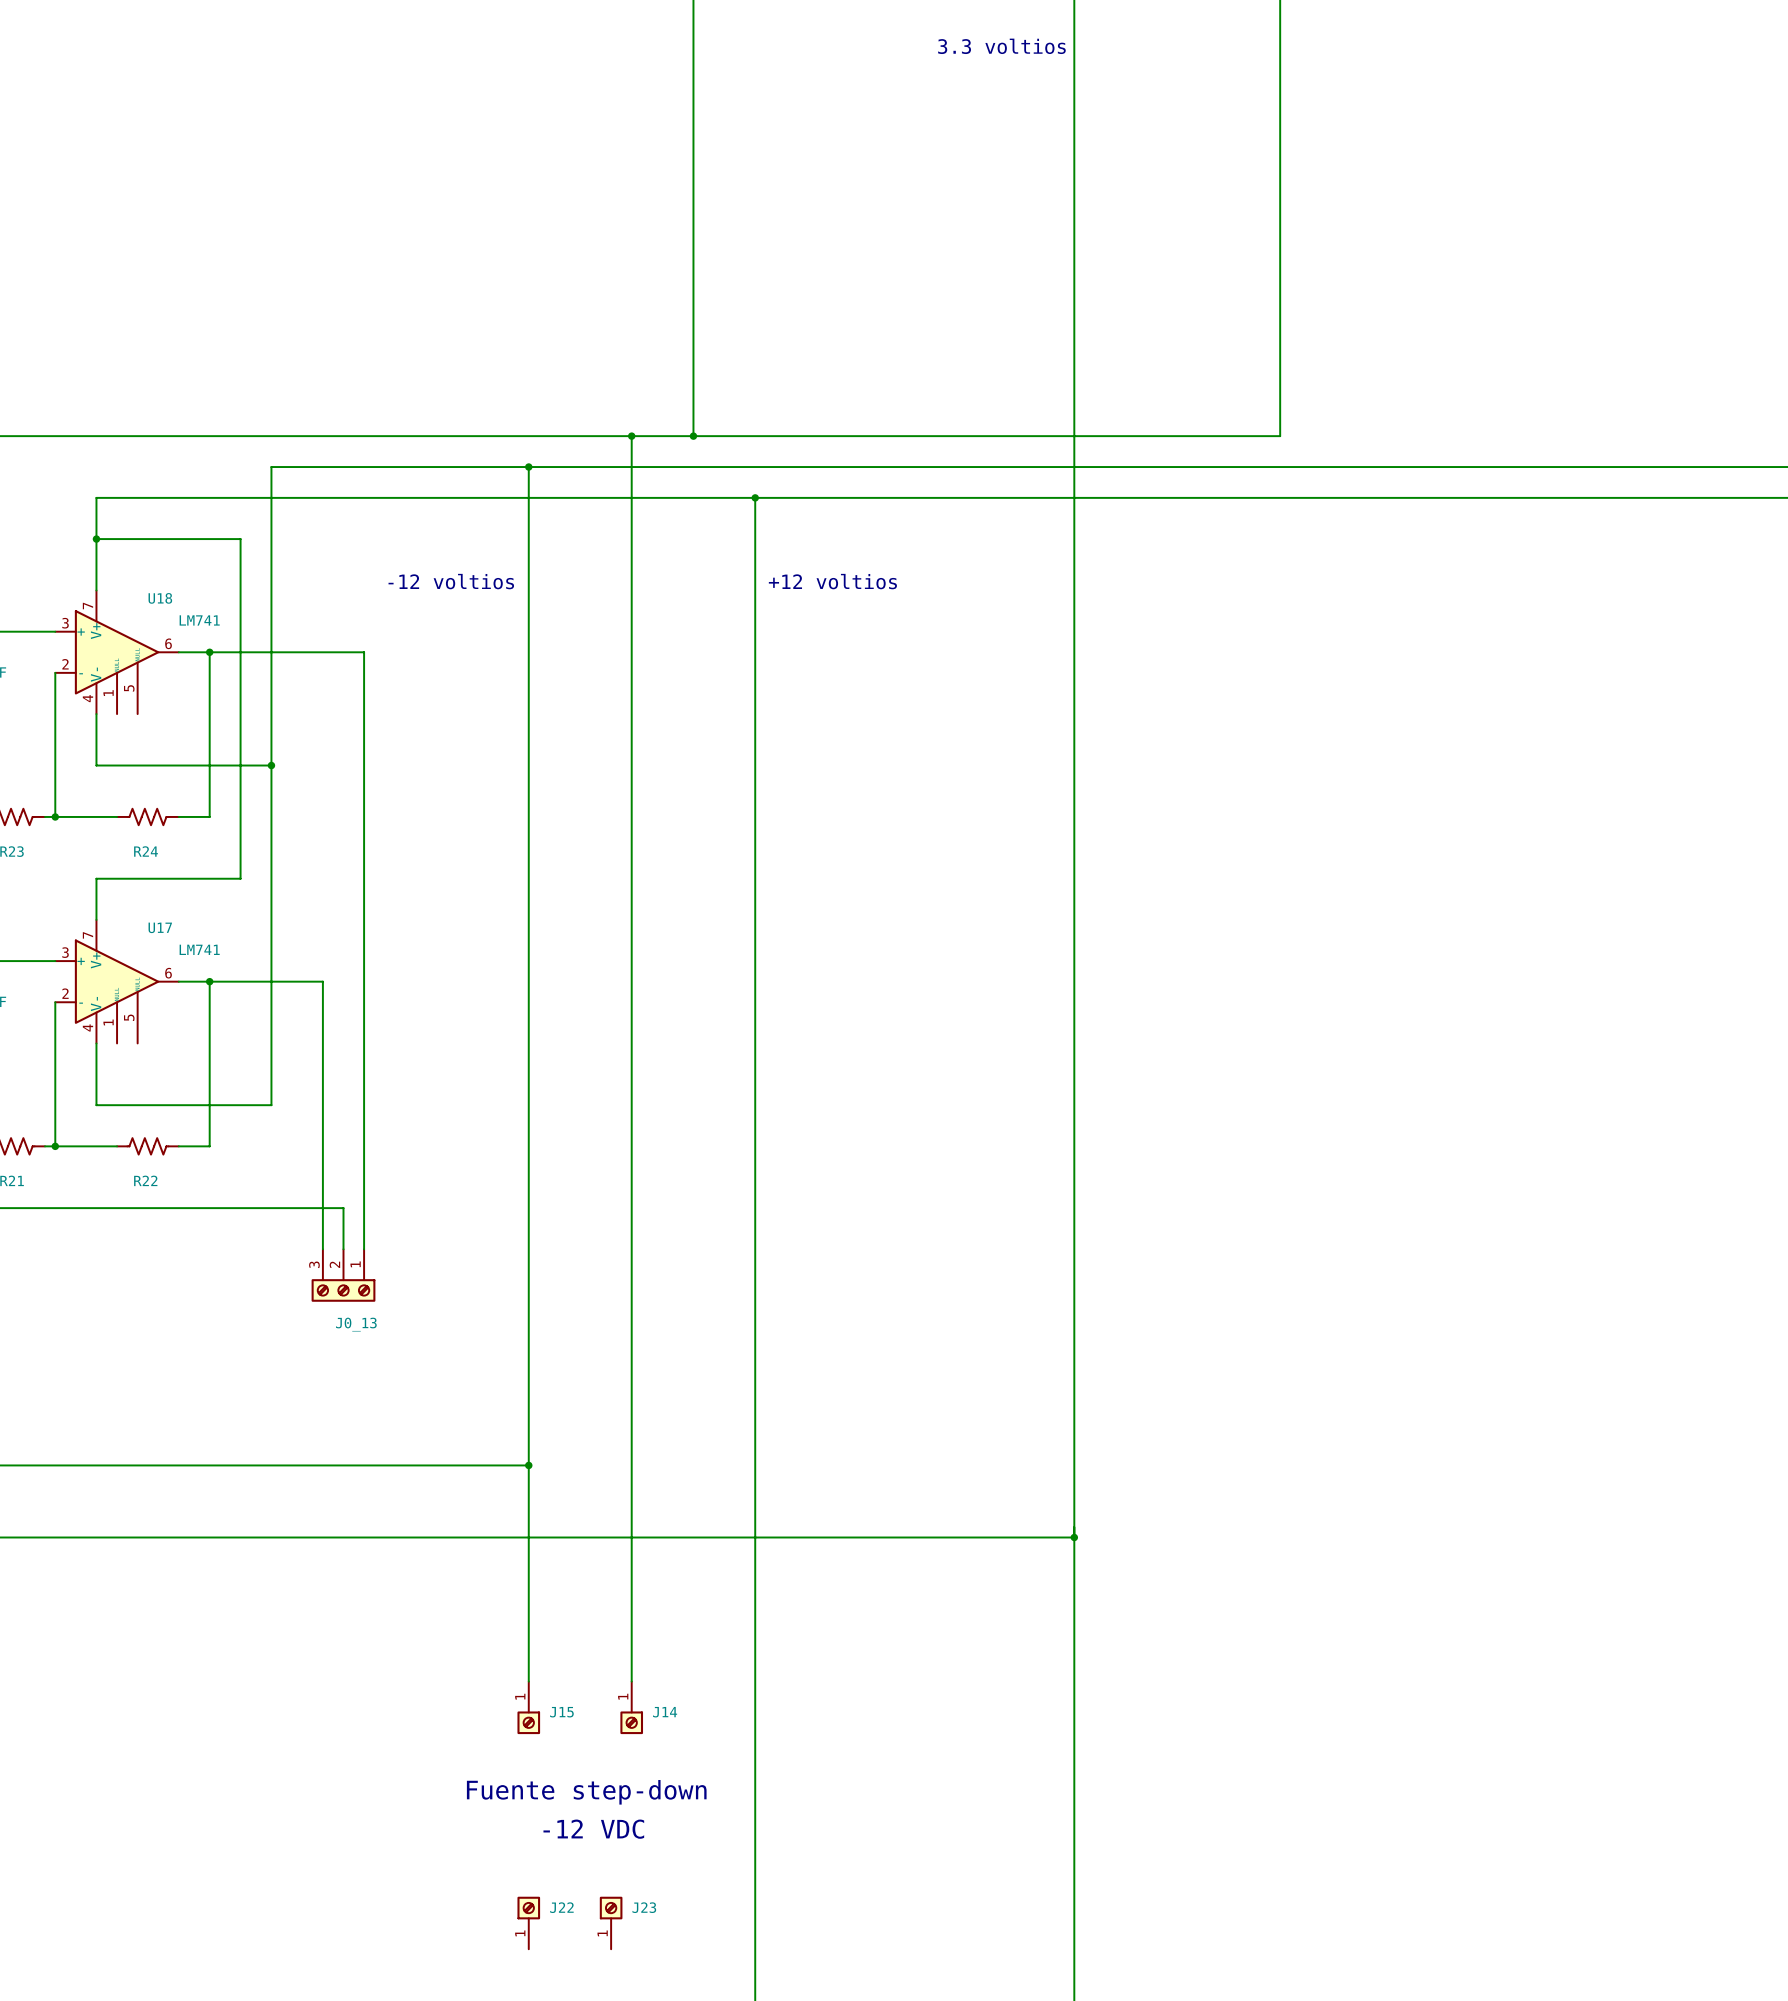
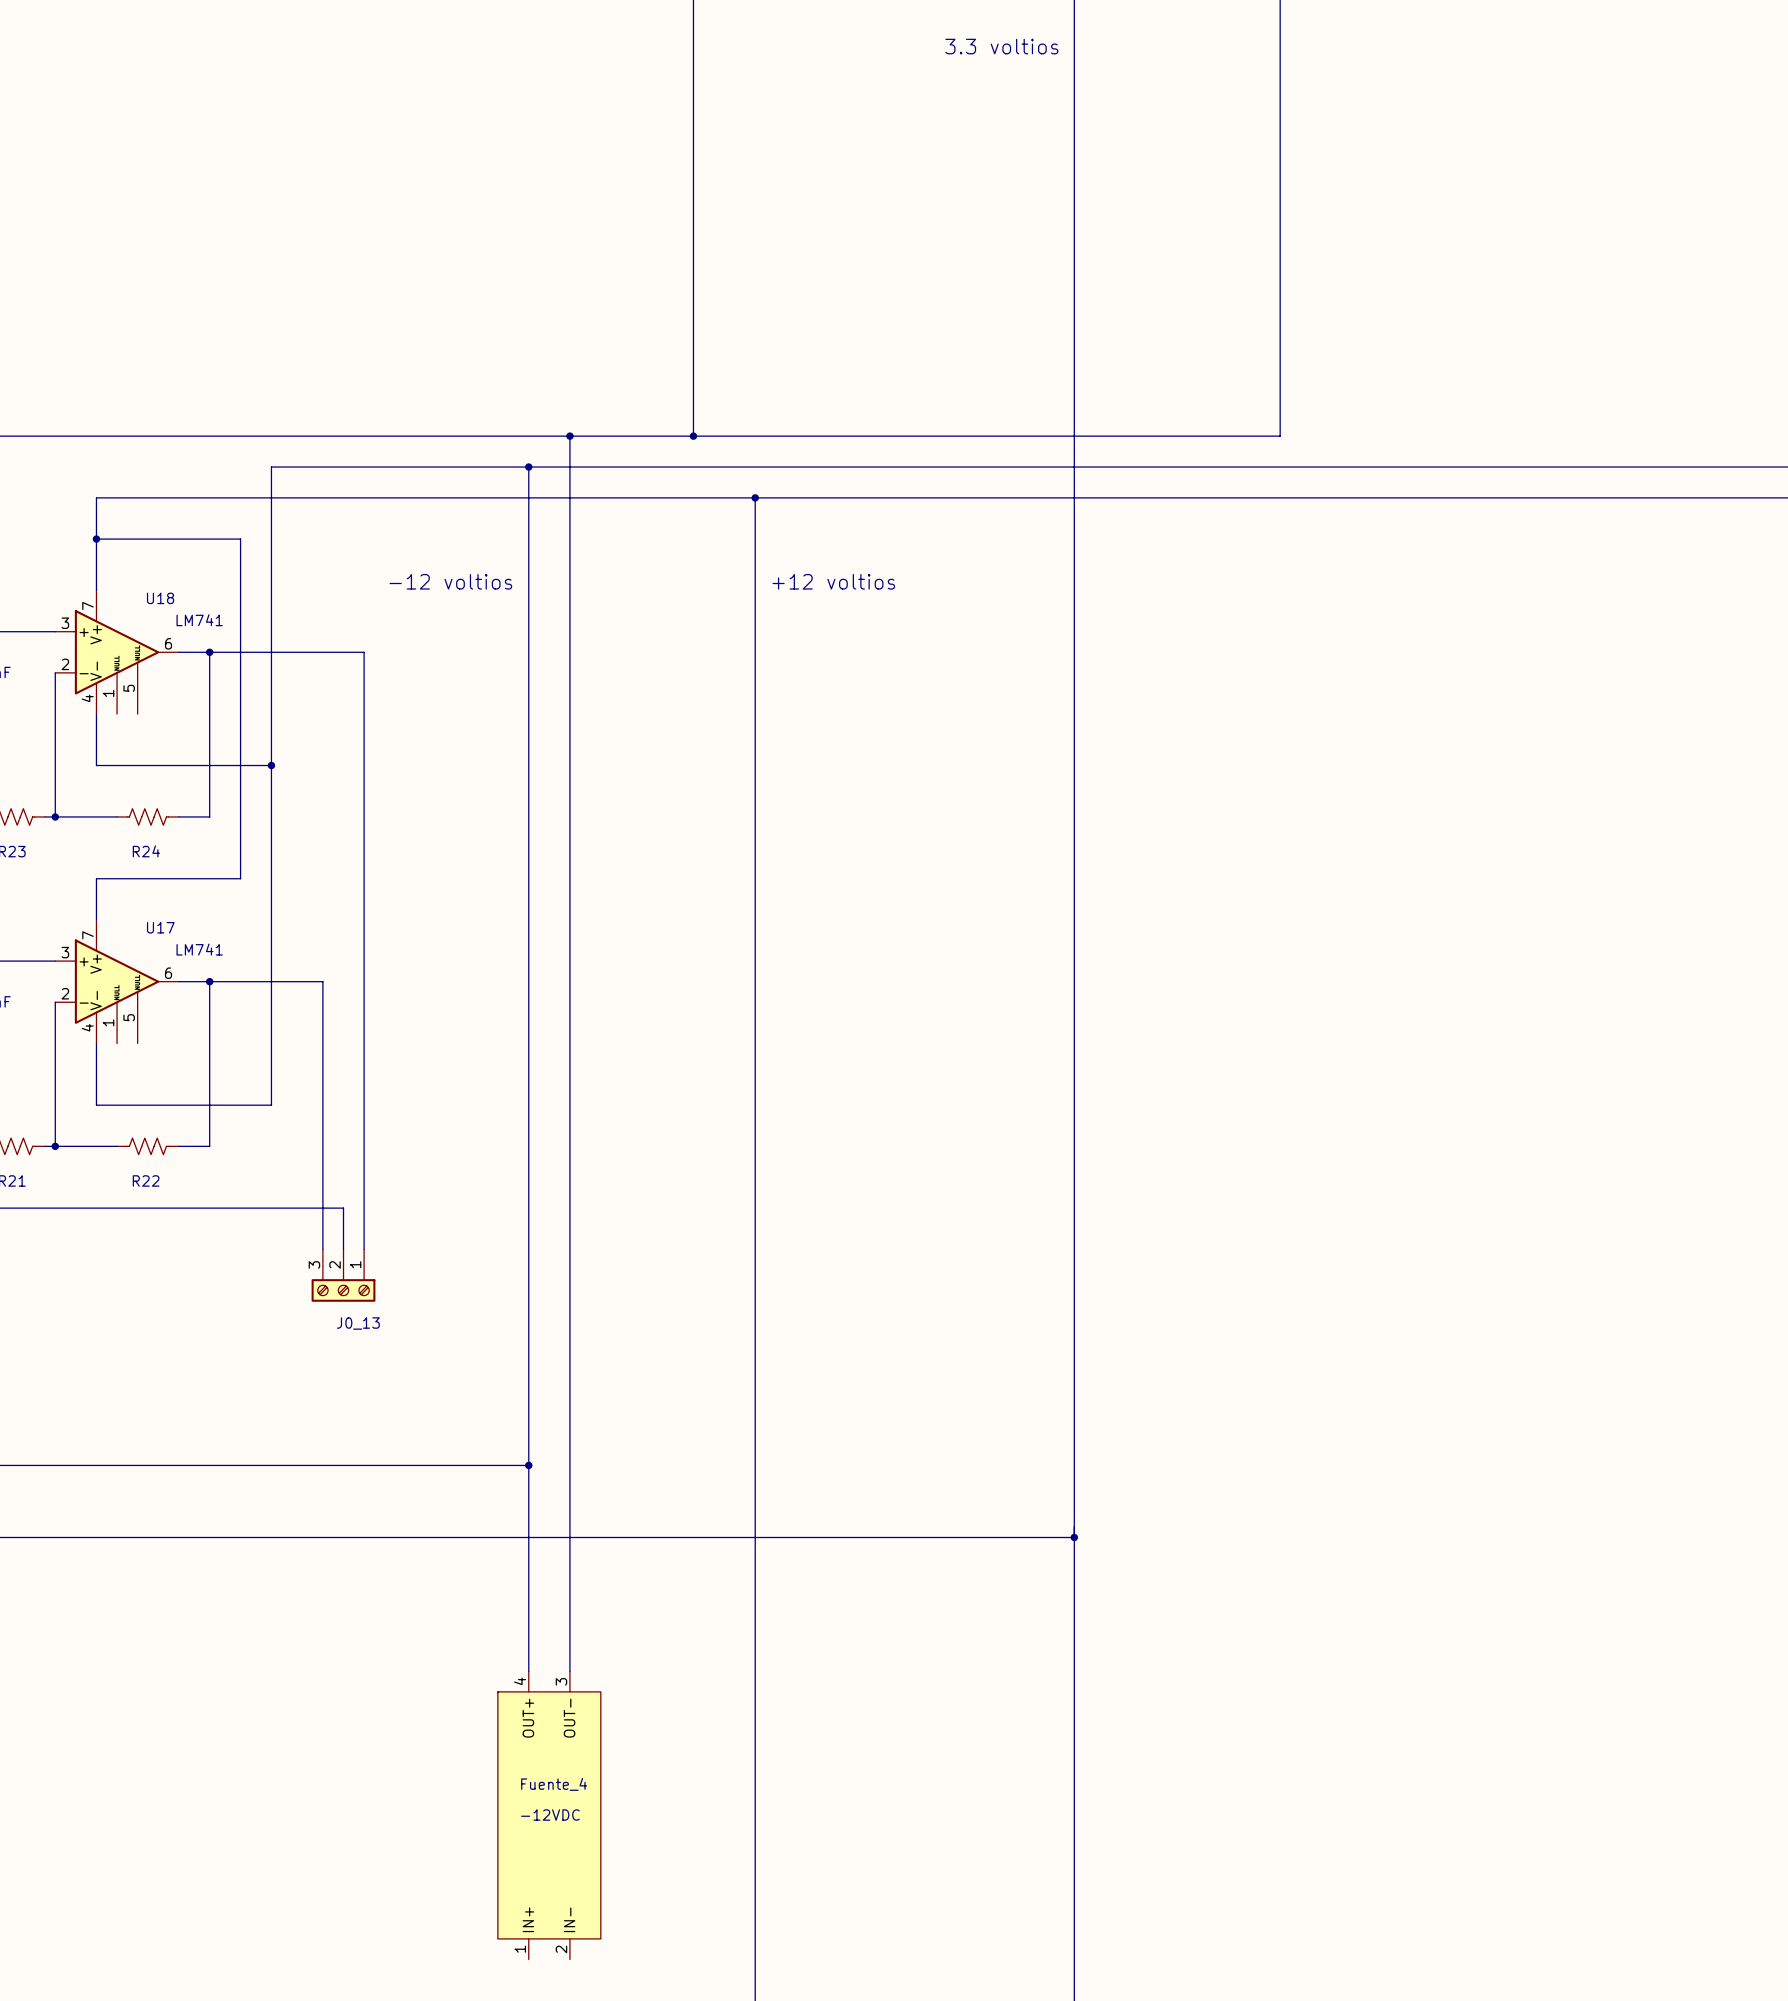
wire: none -> (569, 436) (569, 1671)
junction: none -> (569, 436)
wire: (631, 436) (631, 1681) -> none
junction: (631, 436) -> none
J15: (528, 1707) -> none
J14: (631, 1707) -> none
text: Fuente step-down (586, 1792) -> none
Fuente_4: none -> -12VDC (549, 1815)
text: -12 VDC (593, 1829) -> none
J22: (528, 1922) -> none
J23: (611, 1922) -> none

